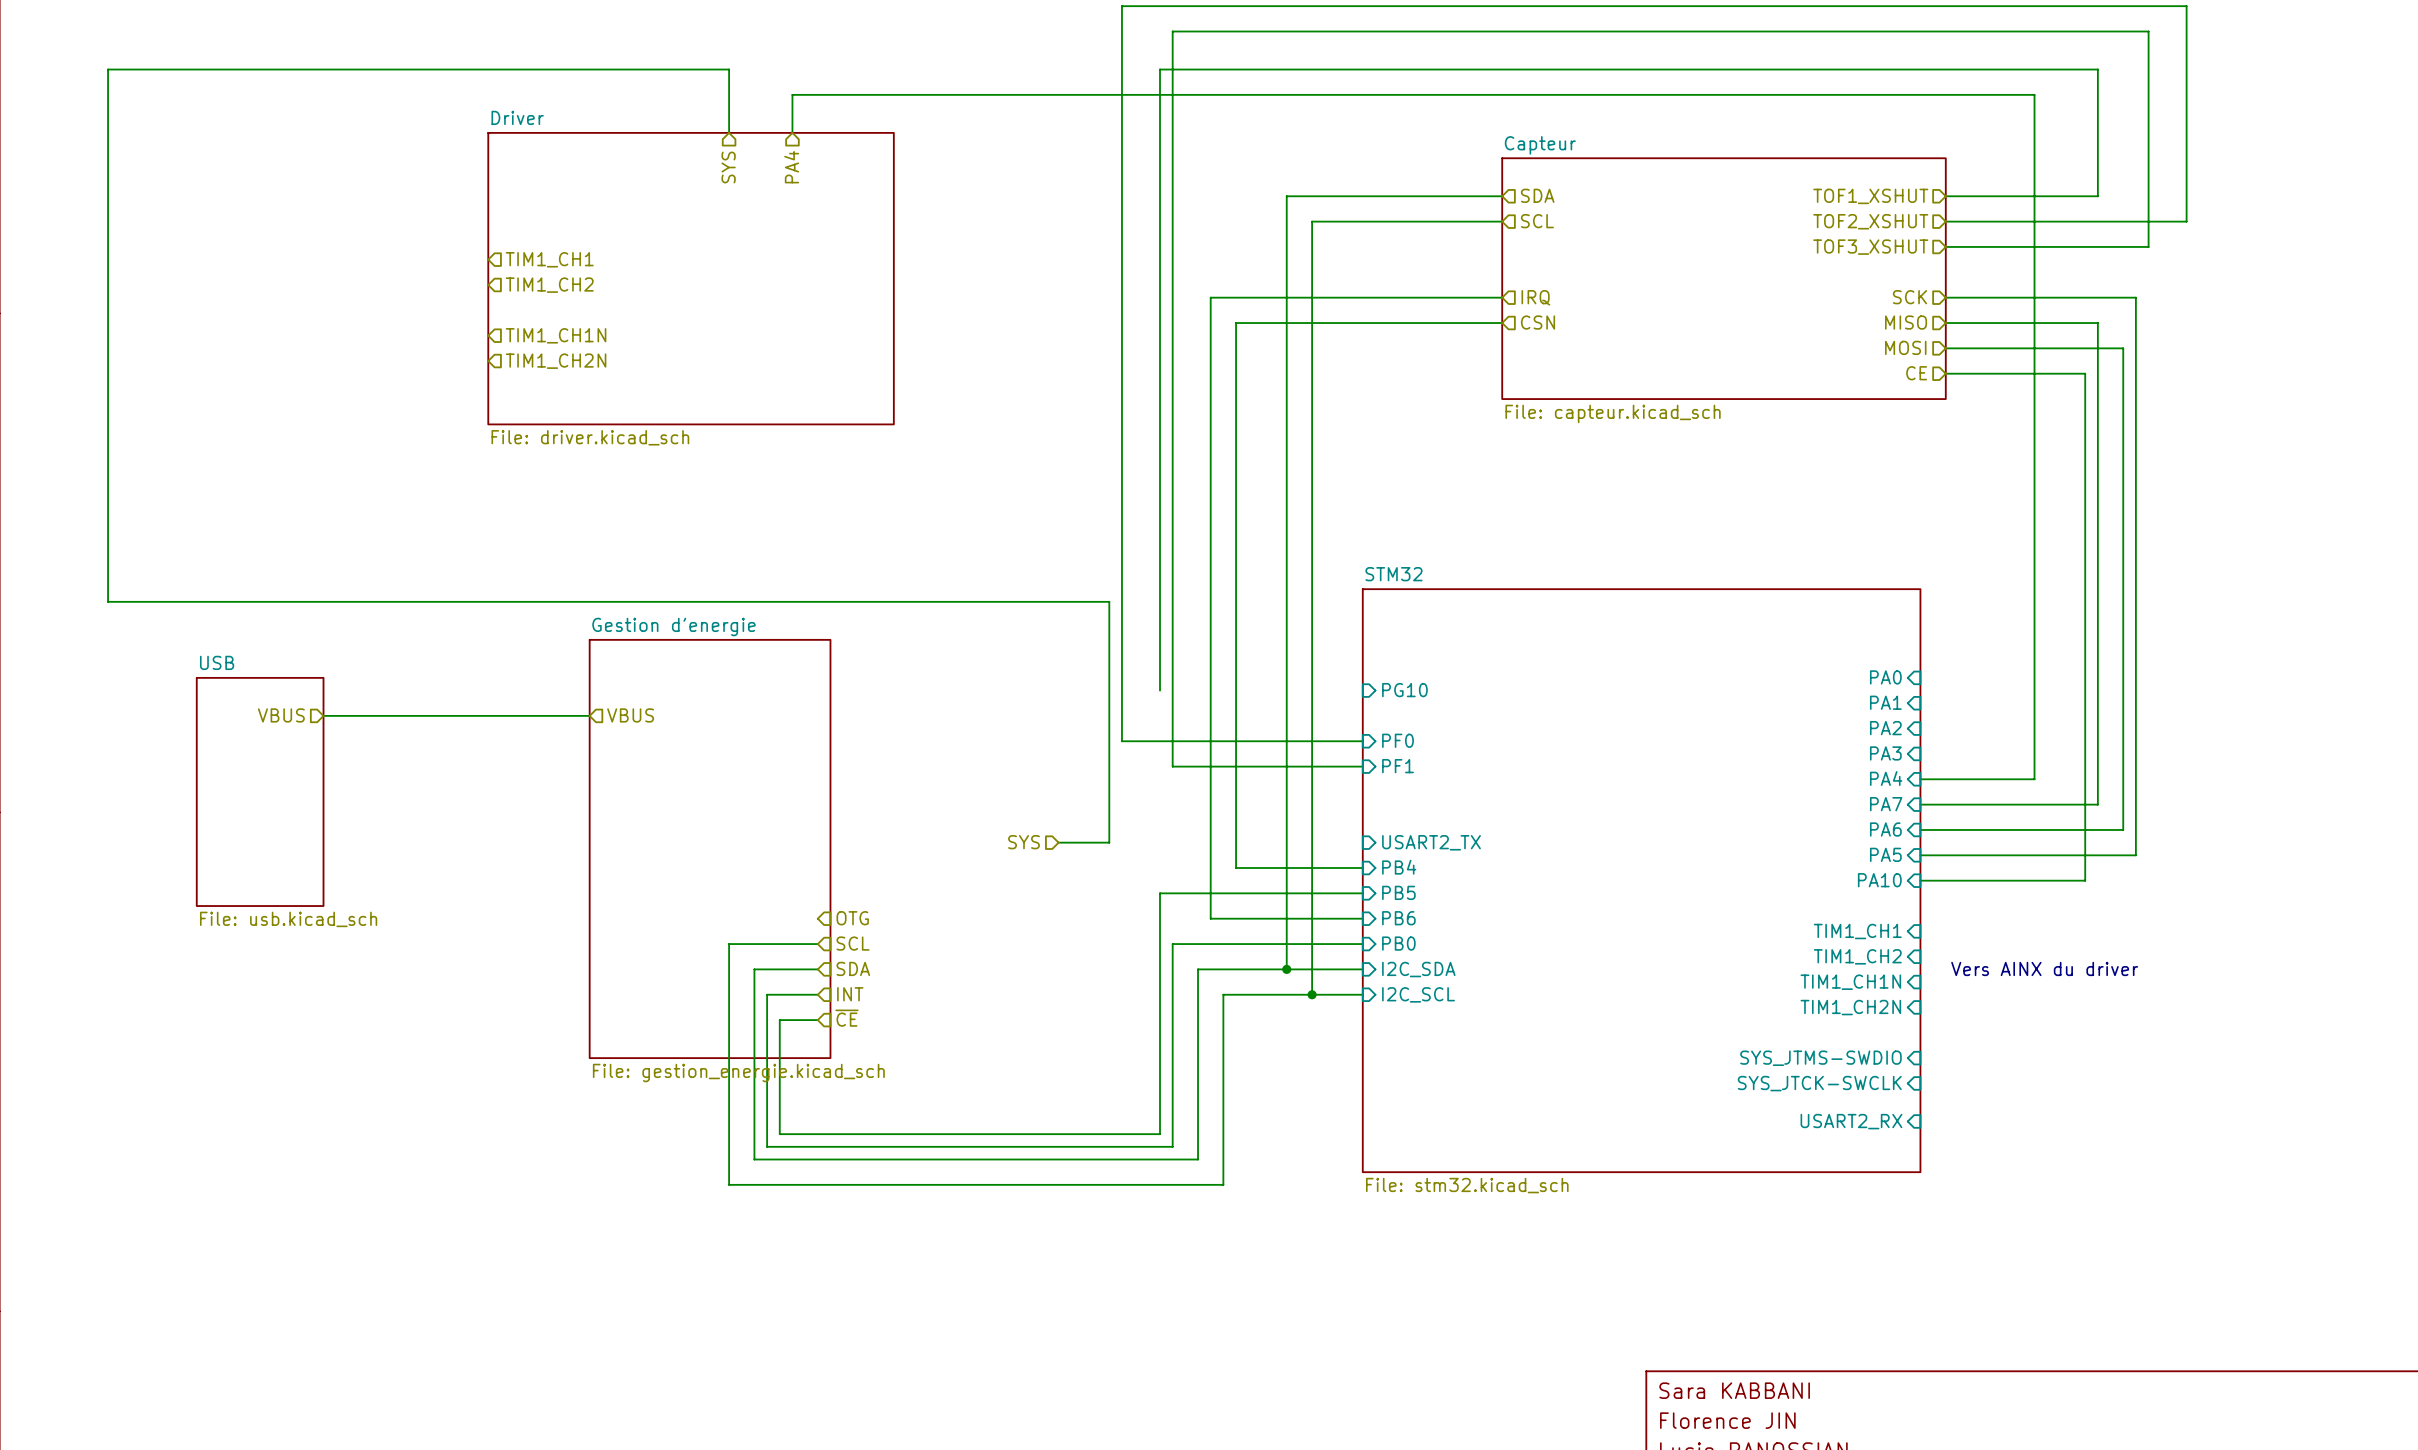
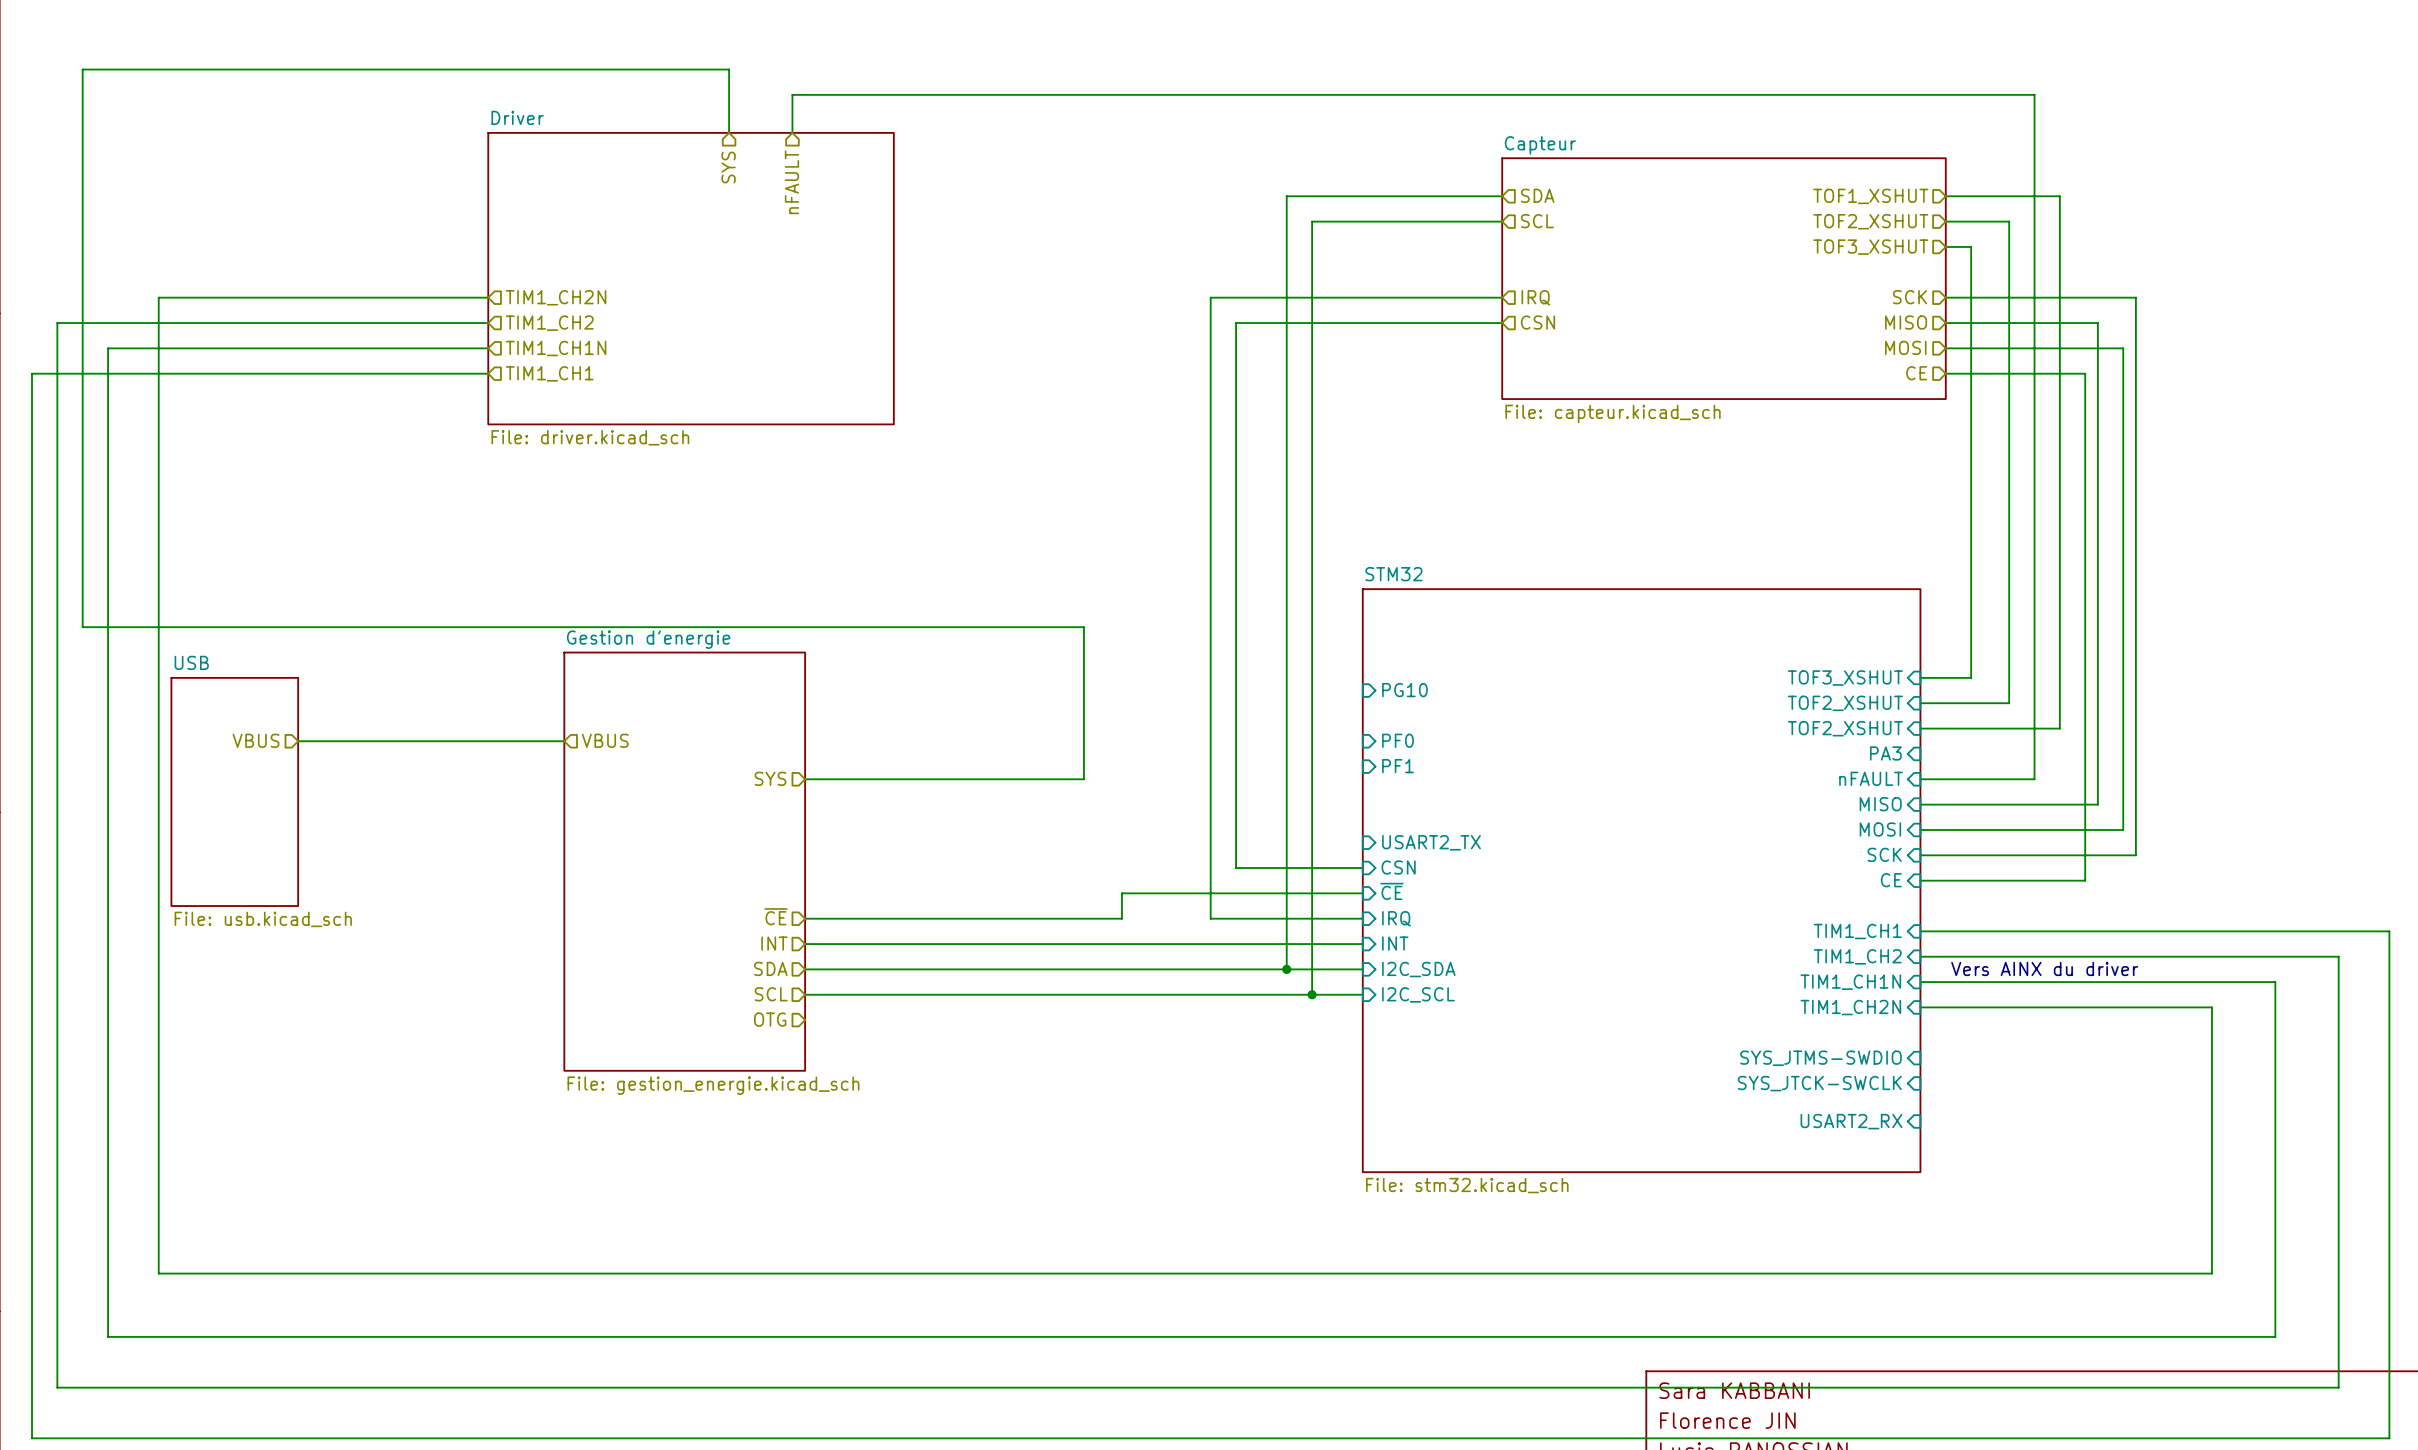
wire: (108, 69) (108, 348) -> (488, 348) (108, 348)
wire: none -> (108, 69) (82, 69) (82, 627) (1083, 627) (1083, 779) (805, 779)
hierarchical label: PA4 (791, 167) -> nFAULT (791, 182)
wire: (2059, 196) (2097, 196) (2097, 69) (1160, 69) (1160, 690) -> (2059, 196) (2059, 728) (1920, 728)
wire: (2009, 221) (2186, 221) (2186, 6) (1121, 6) (1121, 741) (1362, 741) -> (2009, 221) (2009, 703) (1920, 703)
wire: (1971, 246) (2148, 246) (2148, 31) (1172, 31) (1172, 766) (1362, 766) -> (1971, 246) (1971, 677) (1920, 677)
hierarchical label position: TIM1_CH1 (549, 259) -> TIM1_CH1 (549, 373)
hierarchical label position: TIM1_CH2 (549, 285) -> TIM1_CH2 (549, 323)
wire: none -> (488, 297) (158, 297) (158, 1273) (2211, 1273) (2211, 1007) (1920, 1007)
wire: none -> (488, 323) (57, 323) (57, 1387) (2338, 1387) (2338, 956) (1920, 956)
hierarchical label position: TIM1_CH1N (556, 335) -> TIM1_CH1N (556, 348)
hierarchical label position: TIM1_CH2N (556, 361) -> TIM1_CH2N (556, 297)
wire: none -> (488, 373) (32, 373) (32, 1438) (2389, 1438) (2389, 931) (1920, 931)
wire: (108, 601) (1109, 601) (1109, 842) (1058, 842) -> (108, 601) (108, 1336) (2275, 1336) (2275, 982) (1920, 982)
sheet pin: PA0 (1885, 677) -> TOF3_XSHUT (1845, 678)
sheet pin: PA1 (1885, 702) -> TOF2_XSHUT (1845, 703)
hierarchical label position: VBUS (281, 715) -> VBUS (256, 740)
wire: (323, 715) (589, 715) -> (298, 741) (564, 741)
hierarchical label position: VBUS (630, 715) -> VBUS (605, 740)
sheet pin: PA2 (1885, 728) -> TOF2_XSHUT (1845, 728)
hierarchical label: none -> SYS (770, 778)
sheet pin: PA4 (1886, 778) -> nFAULT (1871, 778)
sheet USB position: (260, 791) -> (234, 791)
sheet pin: PA7 (1886, 804) -> MISO (1880, 804)
sheet pin: PA6 (1885, 829) -> MOSI (1880, 829)
hierarchical label: SYS (1024, 842) -> none
sheet Gestion d'energie position: (710, 848) -> (684, 861)
sheet pin: PA5 (1885, 854) -> SCK (1884, 854)
sheet pin: PB4 (1399, 867) -> CSN (1398, 867)
sheet pin: PA10 (1879, 880) -> CE (1891, 880)
sheet pin: PB5 (1398, 892) -> ~{CE} (1391, 891)
wire: (1160, 893) (1160, 1134) (779, 1134) (779, 1020) (817, 1020) -> (1160, 893) (1121, 893) (1121, 918) (805, 918)
hierarchical label rotation: 0° (852, 918) -> 180° (770, 1019)
hierarchical label position: OTG (852, 918) -> OTG (770, 1019)
sheet pin: PB6 (1398, 918) -> IRQ (1396, 918)
hierarchical label rotation: 0° (853, 943) -> 180° (771, 994)
hierarchical label position: SCL (853, 943) -> SCL (771, 994)
sheet pin: PB0 (1398, 943) -> INT (1395, 943)
wire: (805, 944) (729, 944) (729, 1184) (1223, 1184) (1223, 994) -> (817, 994) (1223, 994)
wire: (1172, 944) (1172, 1146) (767, 1146) (767, 994) (805, 994) -> (1172, 944) (817, 944)
hierarchical label rotation: 0° (853, 968) -> 180° (770, 968)
hierarchical label position: SDA (853, 968) -> SDA (770, 968)
wire: (805, 969) (754, 969) (754, 1159) (1198, 1159) (1198, 969) -> (817, 969) (1198, 969)
hierarchical label rotation: 0° (850, 994) -> 180° (774, 943)
hierarchical label position: INT (850, 994) -> INT (774, 943)
hierarchical label rotation: 0° (846, 1018) -> 180° (775, 916)
hierarchical label position: ~{CE} (846, 1018) -> ~{CE} (775, 916)

